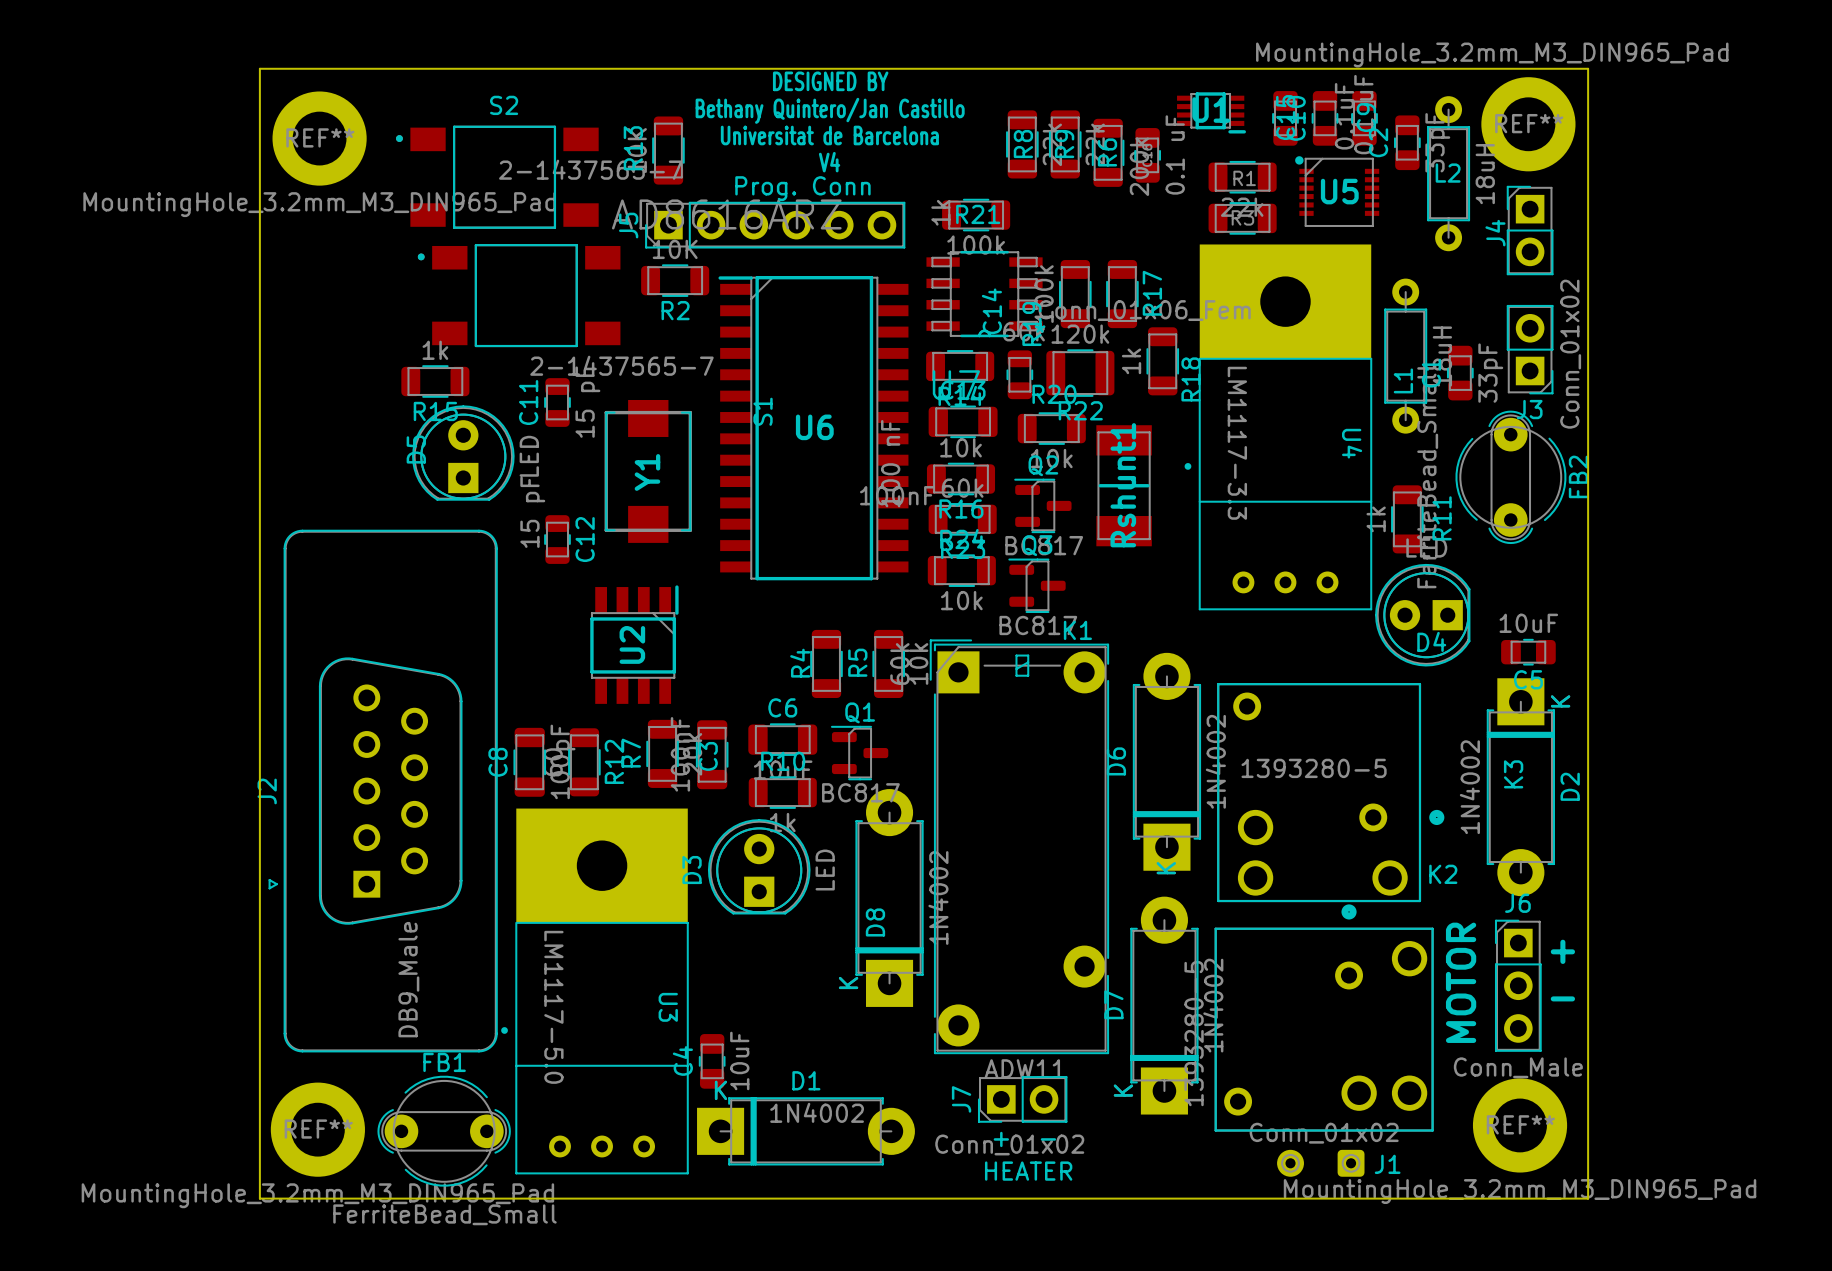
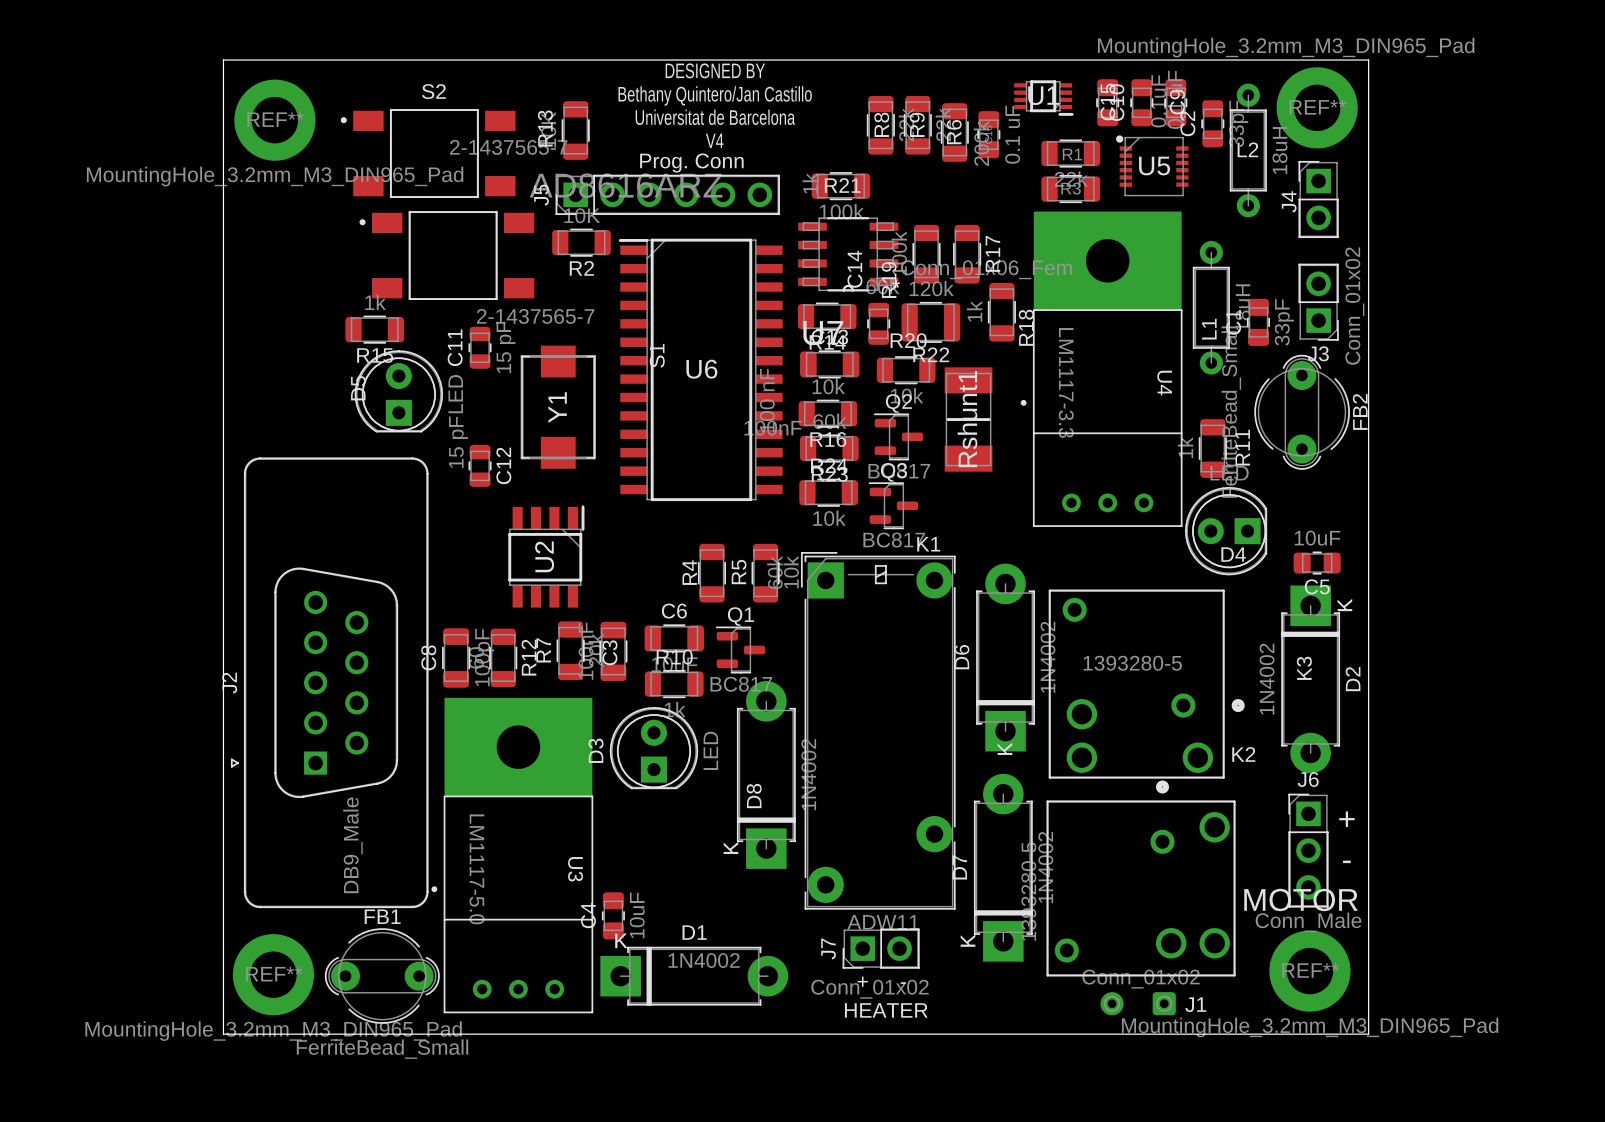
text rotation: 0° (1461, 982) -> 90° clockwise (1301, 899)

